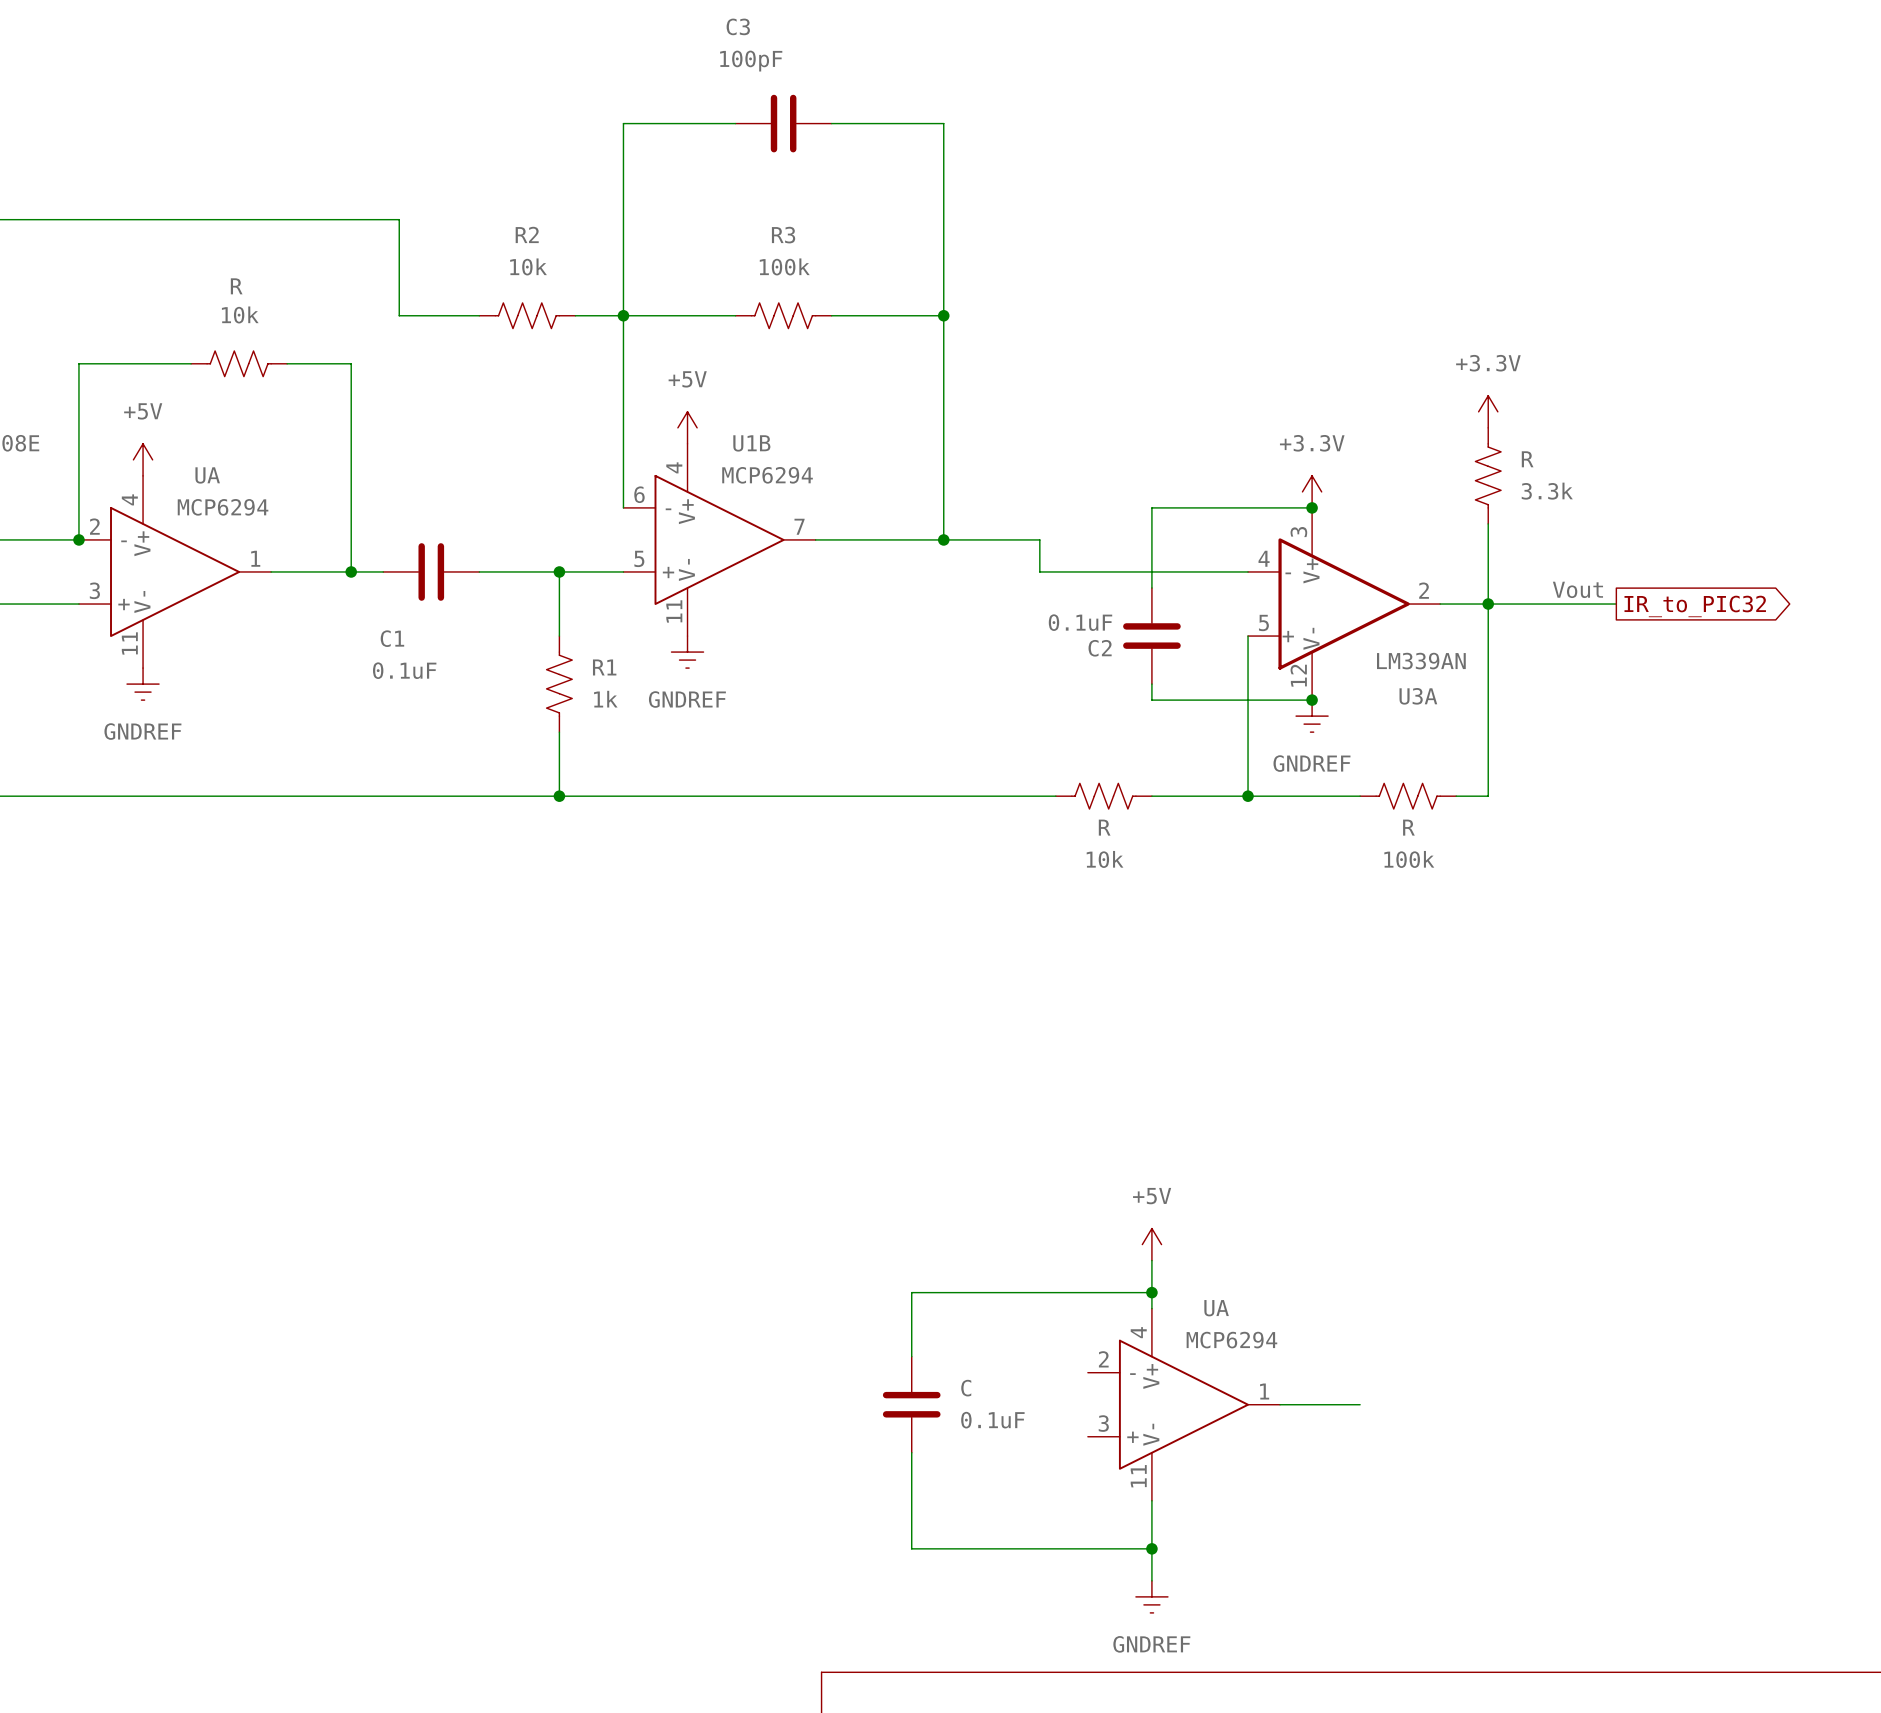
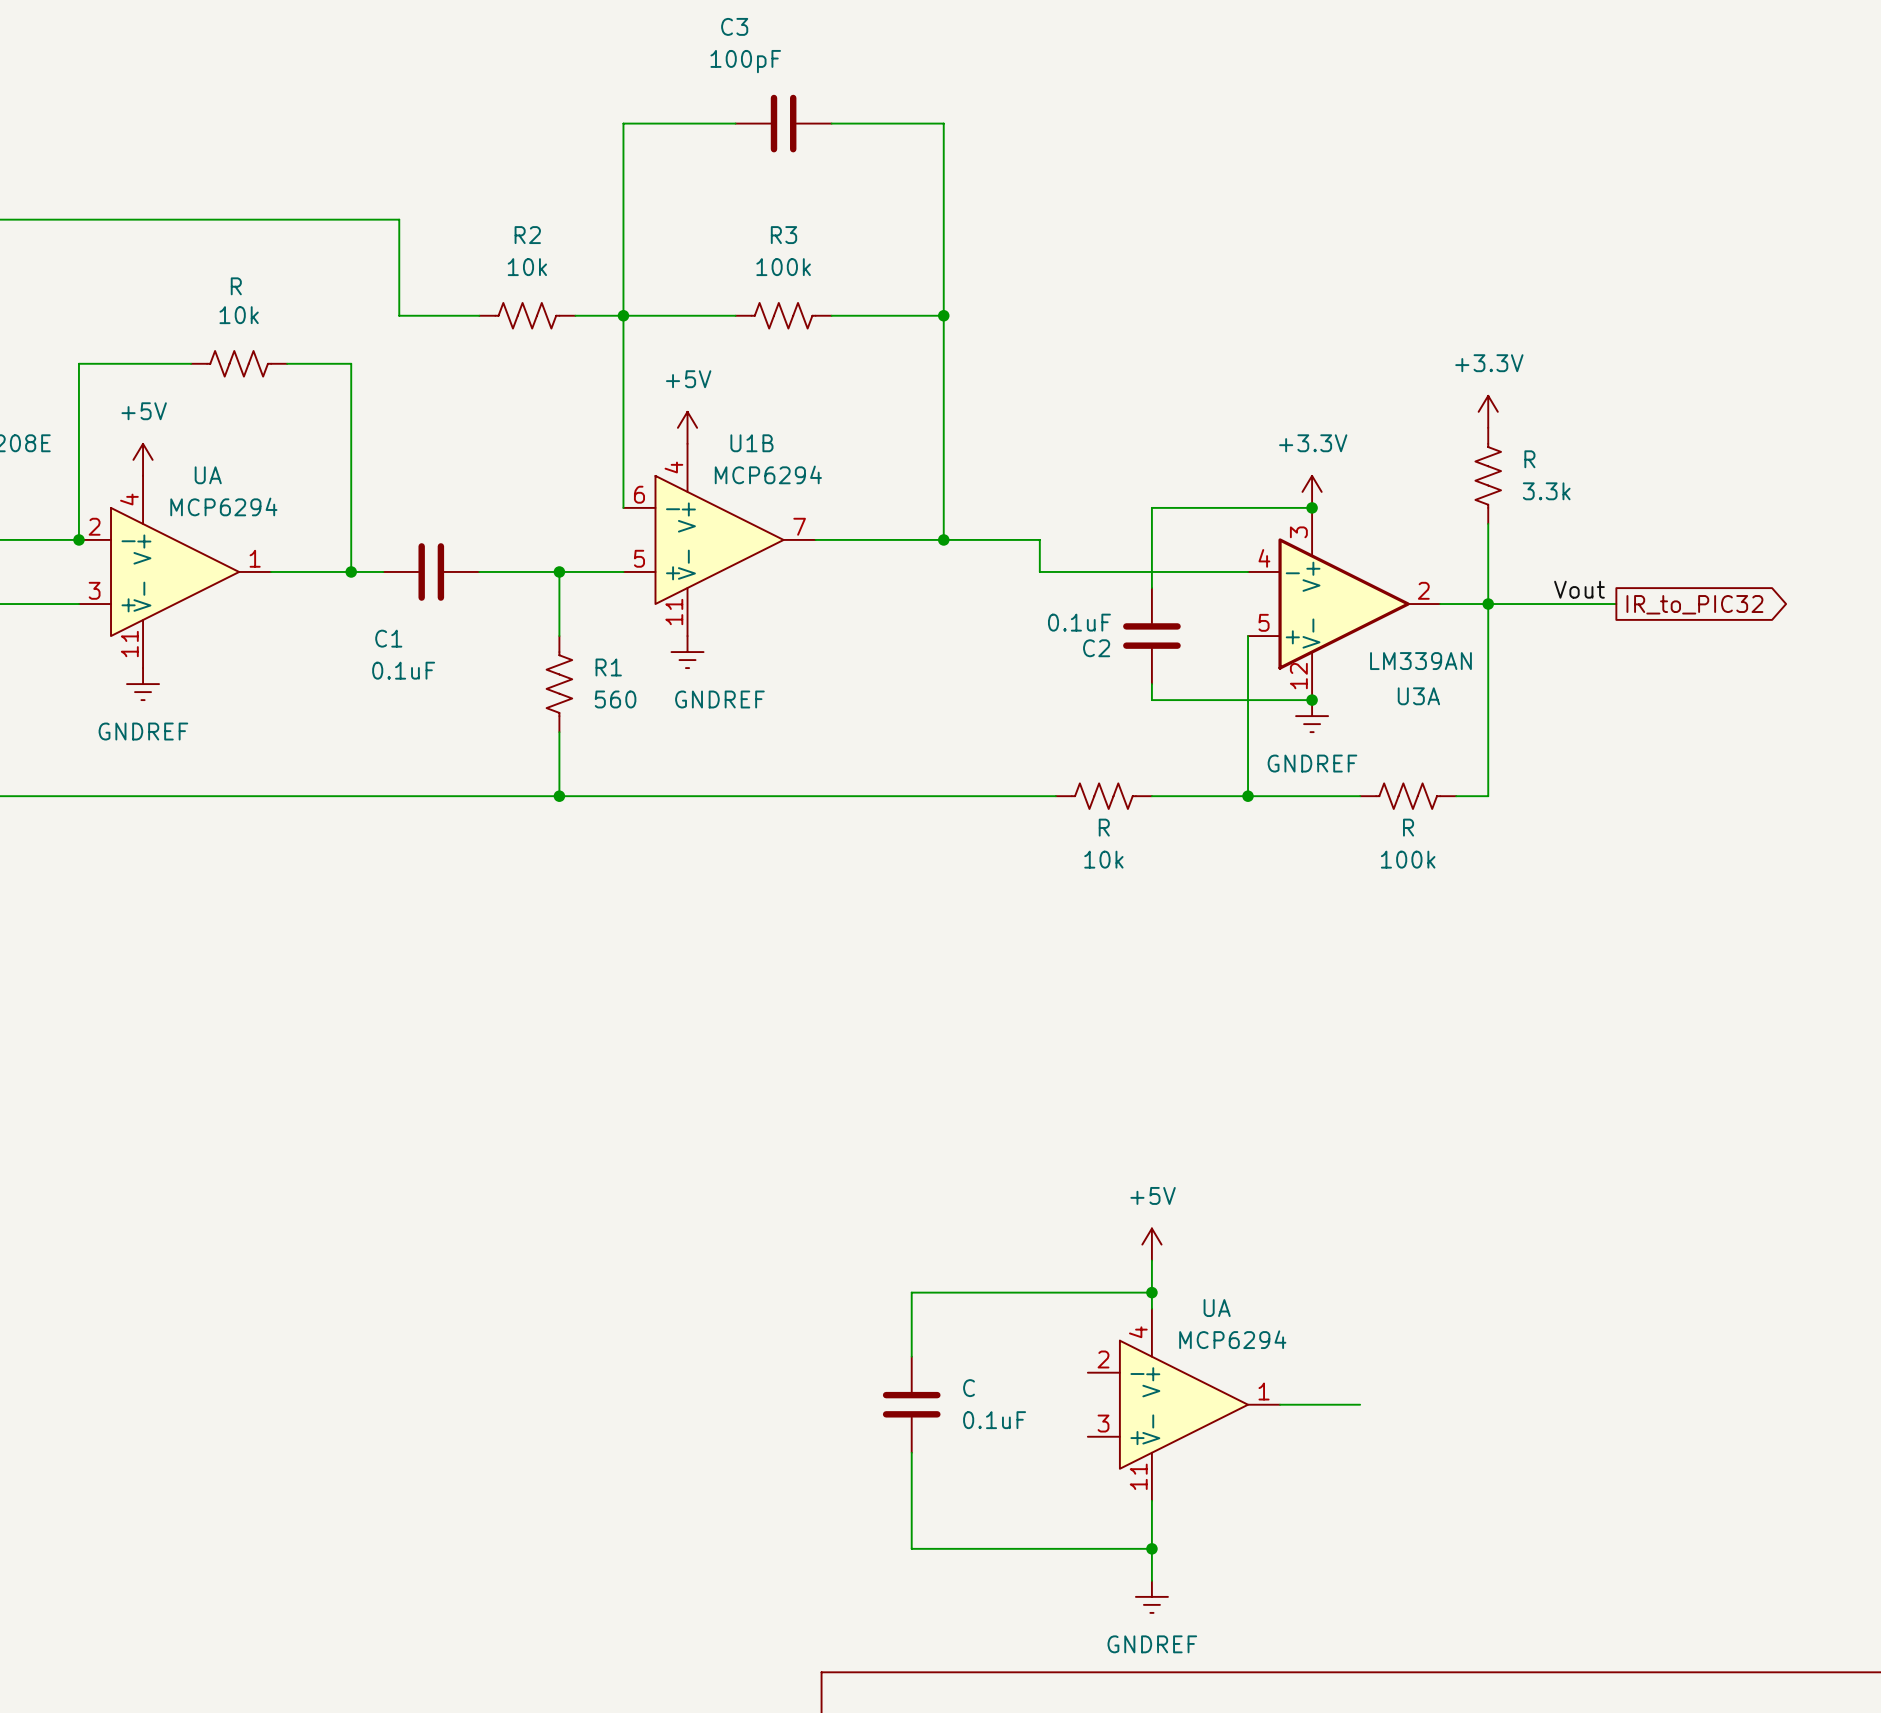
R1 value: 1k (605, 699) -> 560 (615, 699)
power symbol text position: GNDREF (687, 699) -> GNDREF (719, 699)

